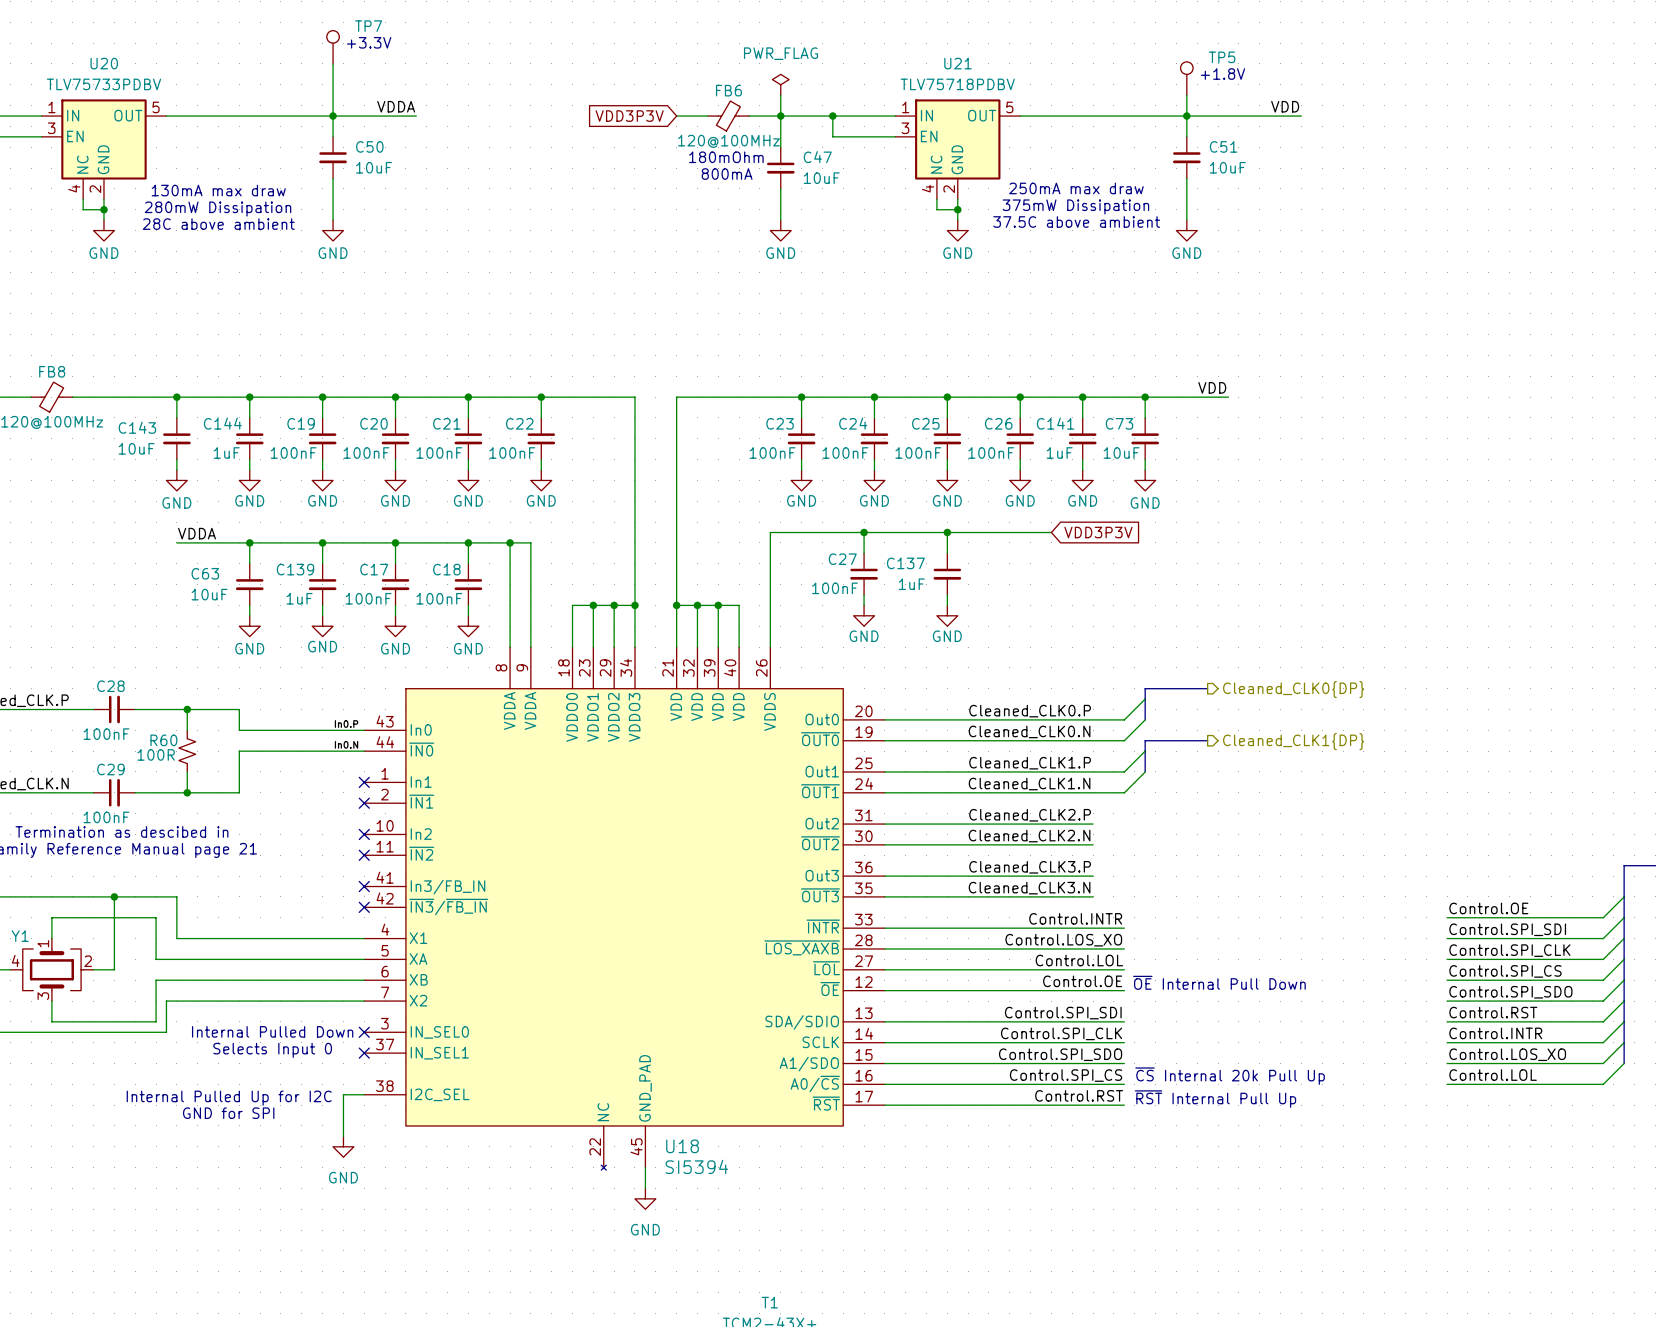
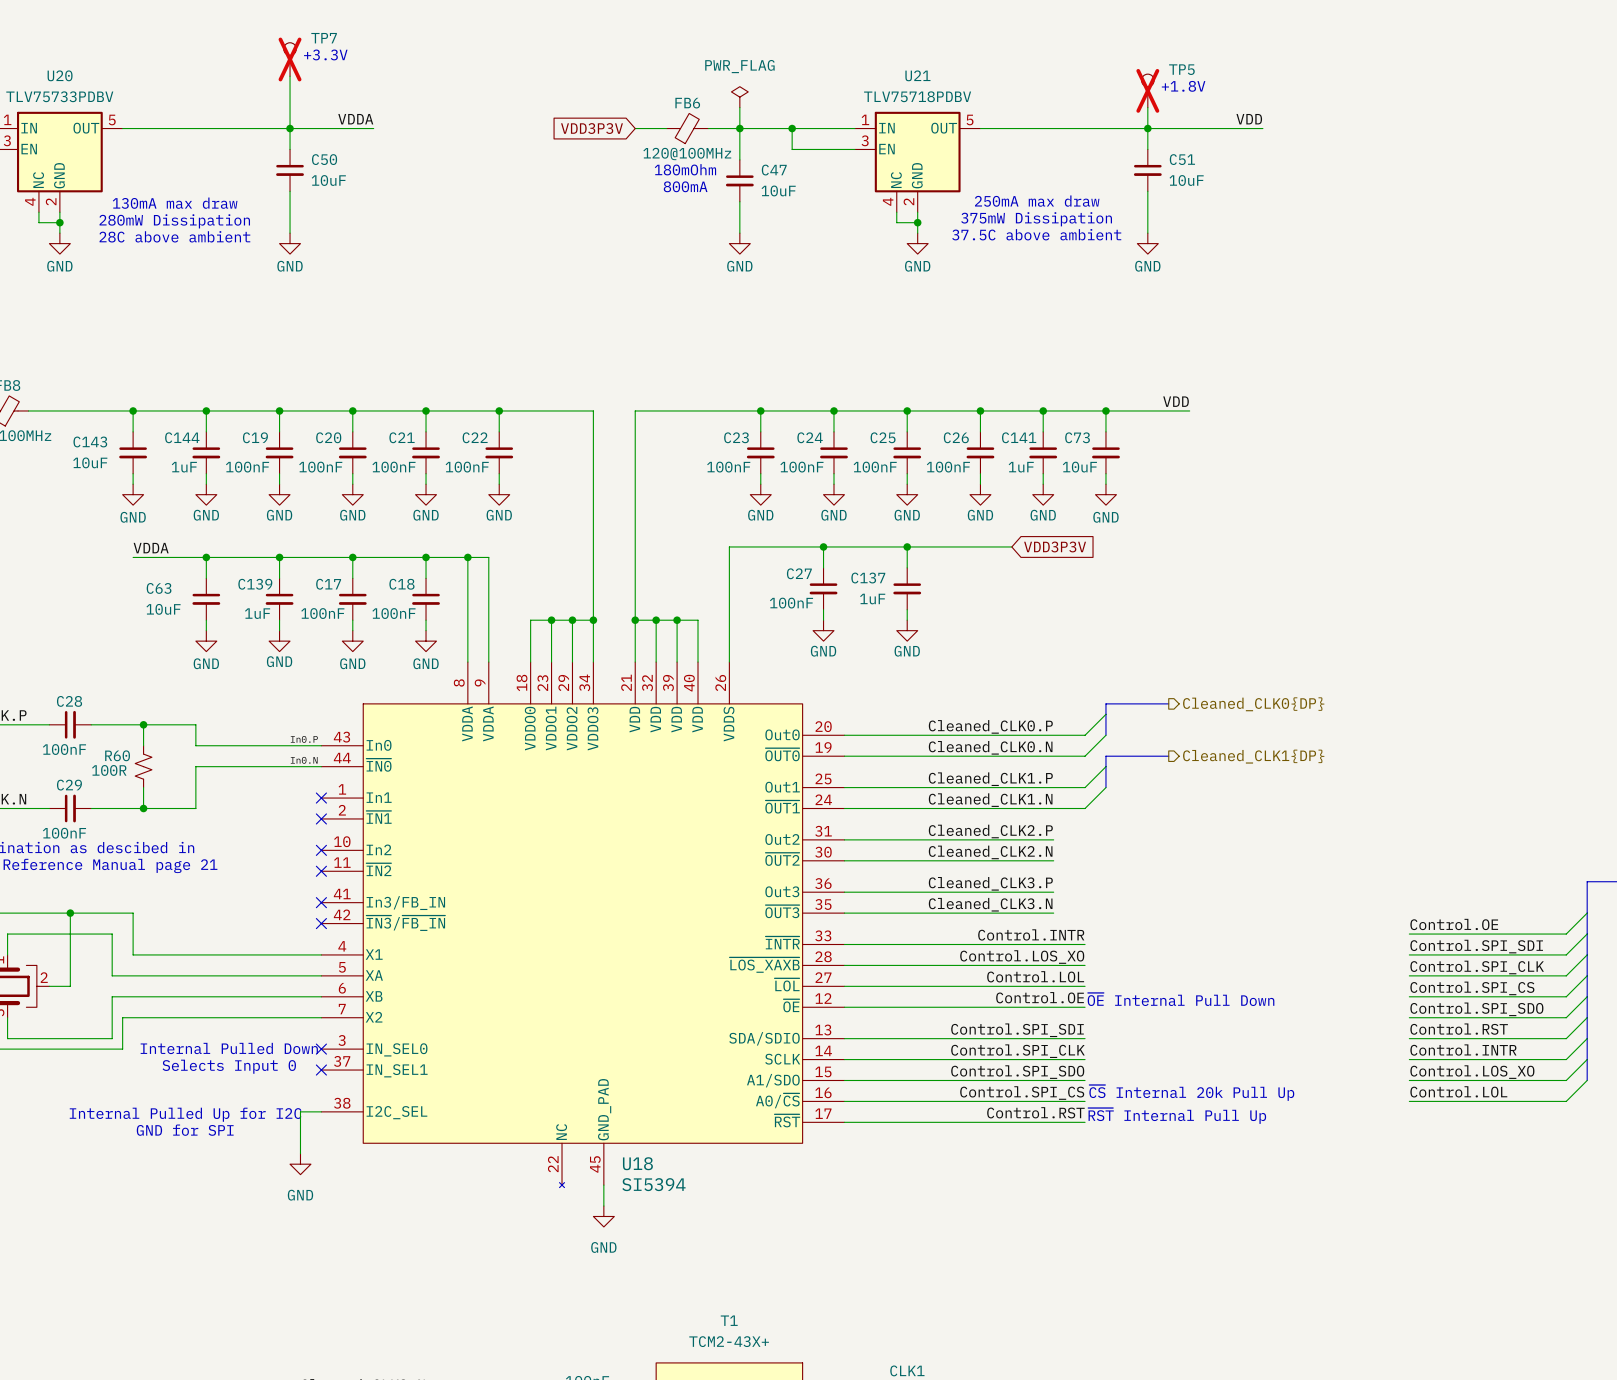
TP7 do-not-place cross: none -> (290, 59)
TP5 do-not-place cross: none -> (1147, 90)

